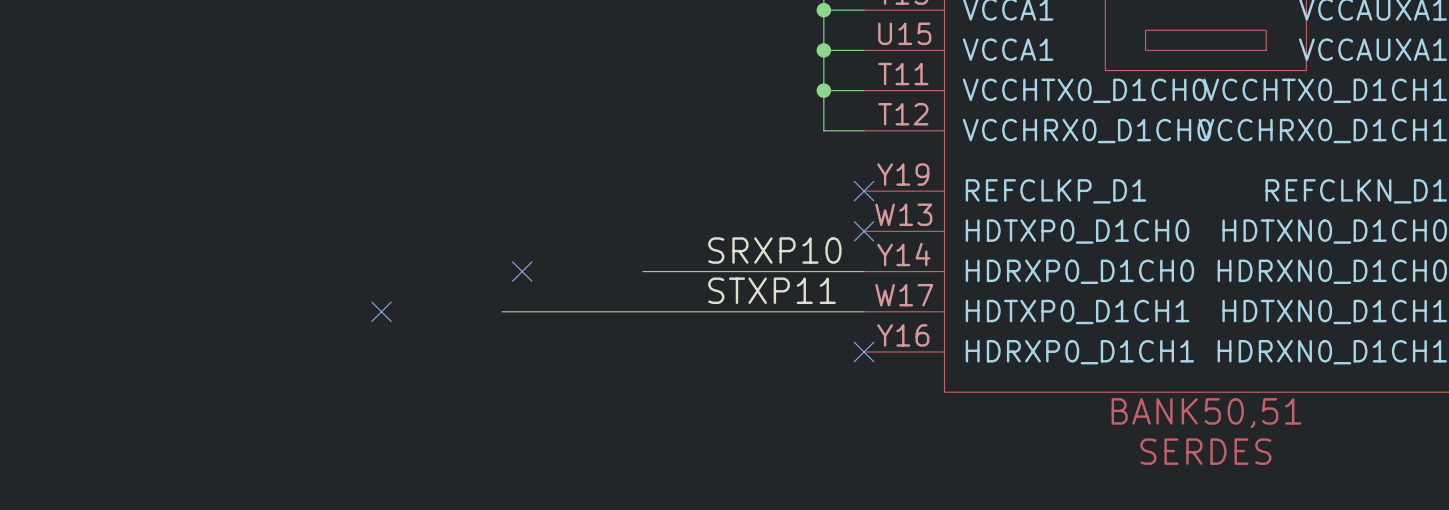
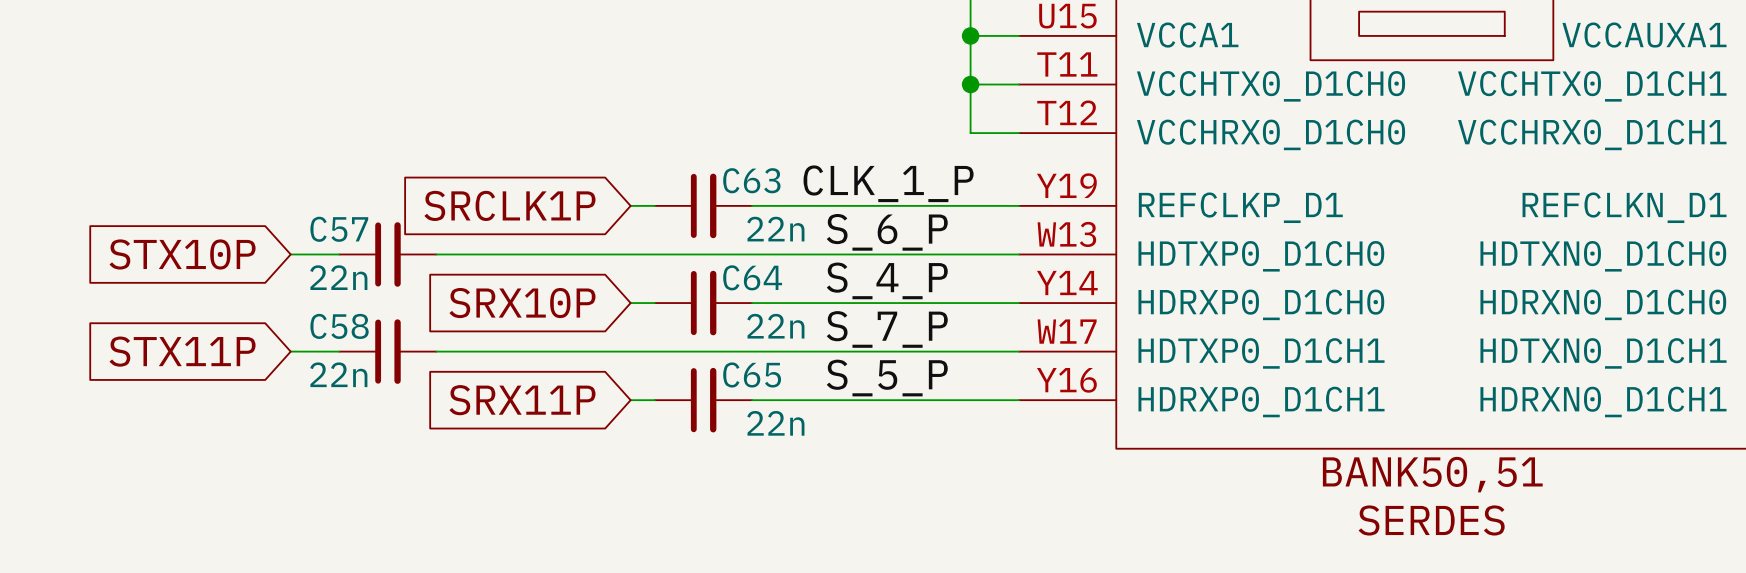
label: none -> CLK_1_P (888, 183)
global label: none -> SRCLK1P (509, 205)
wire: none -> (630, 205) (654, 205)
C63: none -> 22n (703, 205)
wire: none -> (752, 205) (1019, 205)
no-connect mark: (864, 191) -> none
label: none -> S_6_P (887, 232)
global label: none -> STX10P (182, 254)
wire: none -> (290, 254) (339, 254)
C57: none -> 22n (387, 254)
wire: none -> (436, 254) (1019, 254)
no-connect mark: (864, 231) -> none
label: SRXP10 (774, 250) -> S_4_P (887, 280)
global label: none -> SRX10P (522, 303)
no-connect mark: (522, 271) -> none
wire: none -> (630, 303) (654, 303)
C64: none -> 22n (703, 303)
label: STXP11 (772, 290) -> S_7_P (887, 329)
global label: none -> STX11P (182, 351)
wire: none -> (290, 351) (339, 351)
C58: none -> 22n (387, 351)
wire: none -> (436, 351) (582, 351)
no-connect mark: (381, 311) -> none
label: none -> S_5_P (887, 378)
global label: none -> SRX11P (522, 400)
wire: none -> (630, 400) (654, 400)
C65: none -> 22n (703, 400)
wire: none -> (752, 400) (1019, 400)
no-connect mark: (864, 352) -> none

